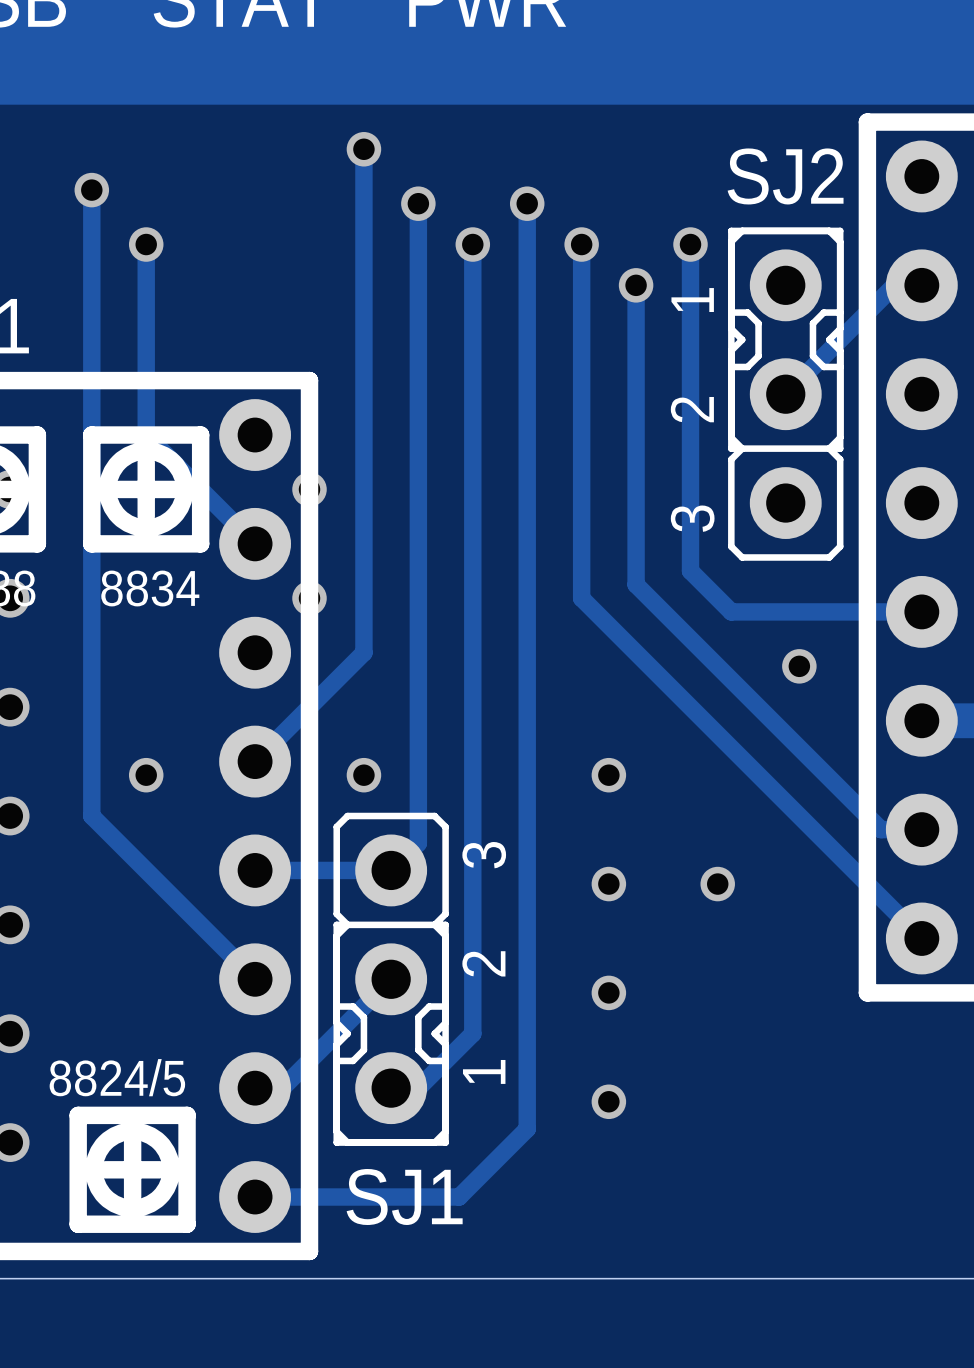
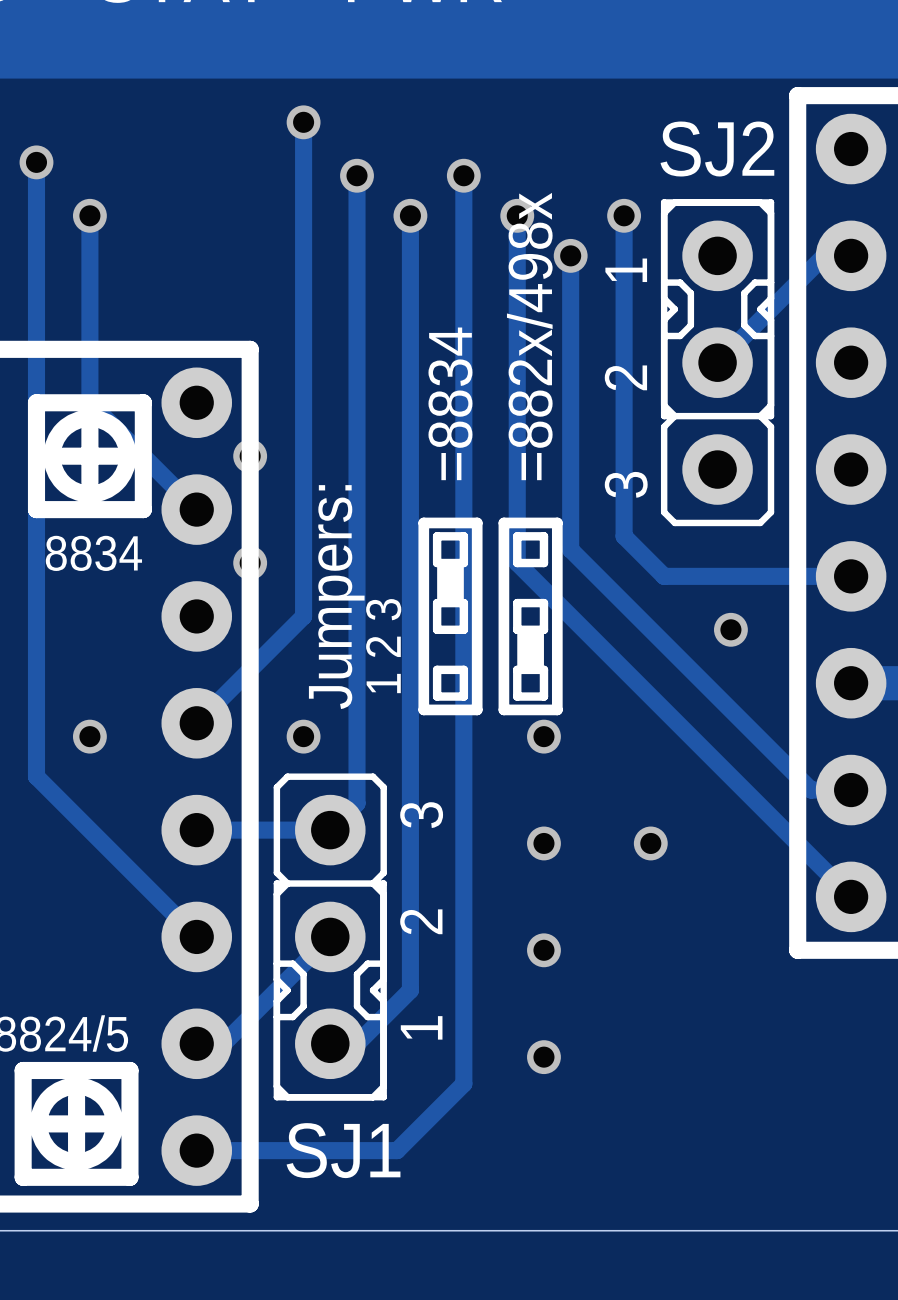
text: none -> =882x/498x (529, 336)
text: none -> =8834 (450, 403)
line: none -> (423, 522) (477, 522) (477, 709) (423, 709) (423, 522)
line: none -> (503, 522) (557, 522) (557, 709) (503, 709) (503, 522)
line: none -> (437, 536) (437, 563) (463, 563) (463, 536) (437, 536)
line: none -> (517, 536) (543, 536) (543, 563) (517, 563) (517, 536)
drawing: none -> [437, 563, 464, 604]
text: none -> Jumpers: (336, 597)
line: none -> (437, 603) (437, 629) (463, 629) (463, 603) (437, 603)
line: none -> (517, 603) (543, 603) (543, 629) (517, 629) (517, 603)
drawing: none -> [517, 629, 544, 670]
text: none -> 1 2 3 (383, 646)
line: none -> (437, 669) (463, 669) (463, 696) (437, 696) (437, 669)
line: none -> (517, 669) (543, 669) (543, 696) (517, 696) (517, 669)

